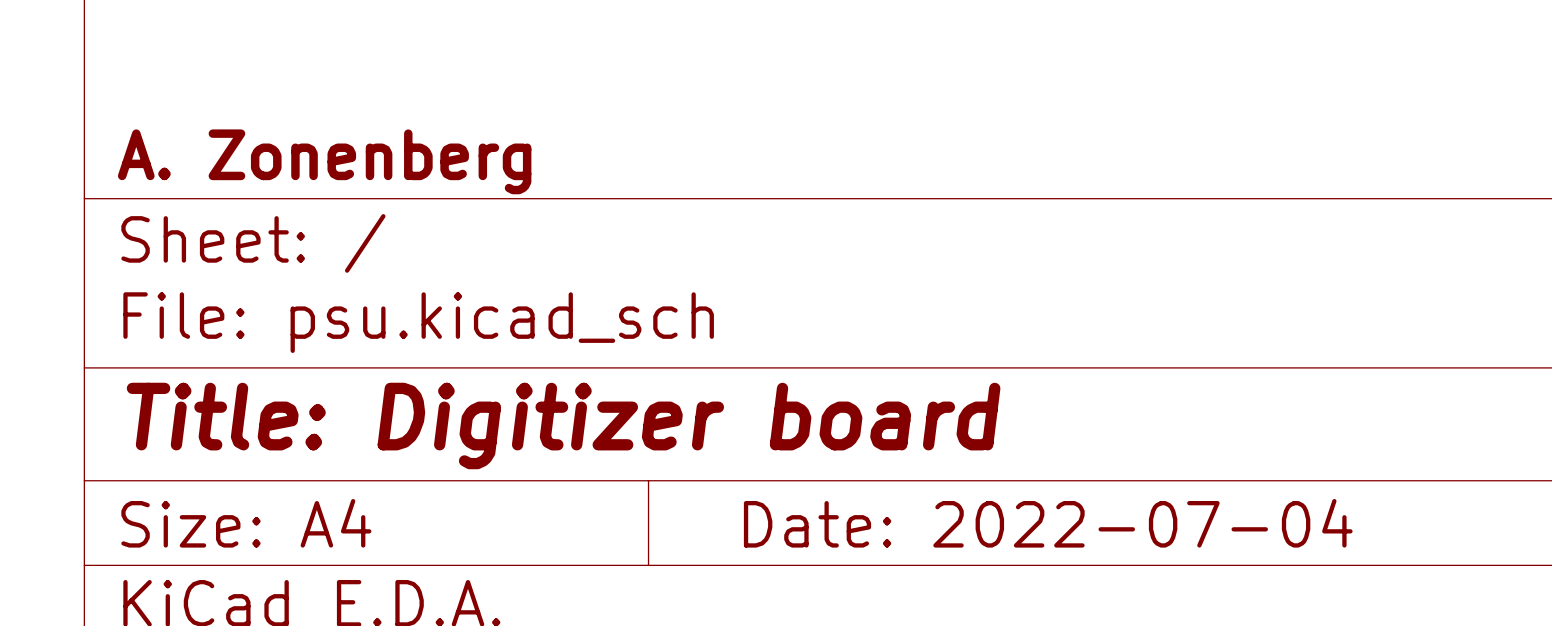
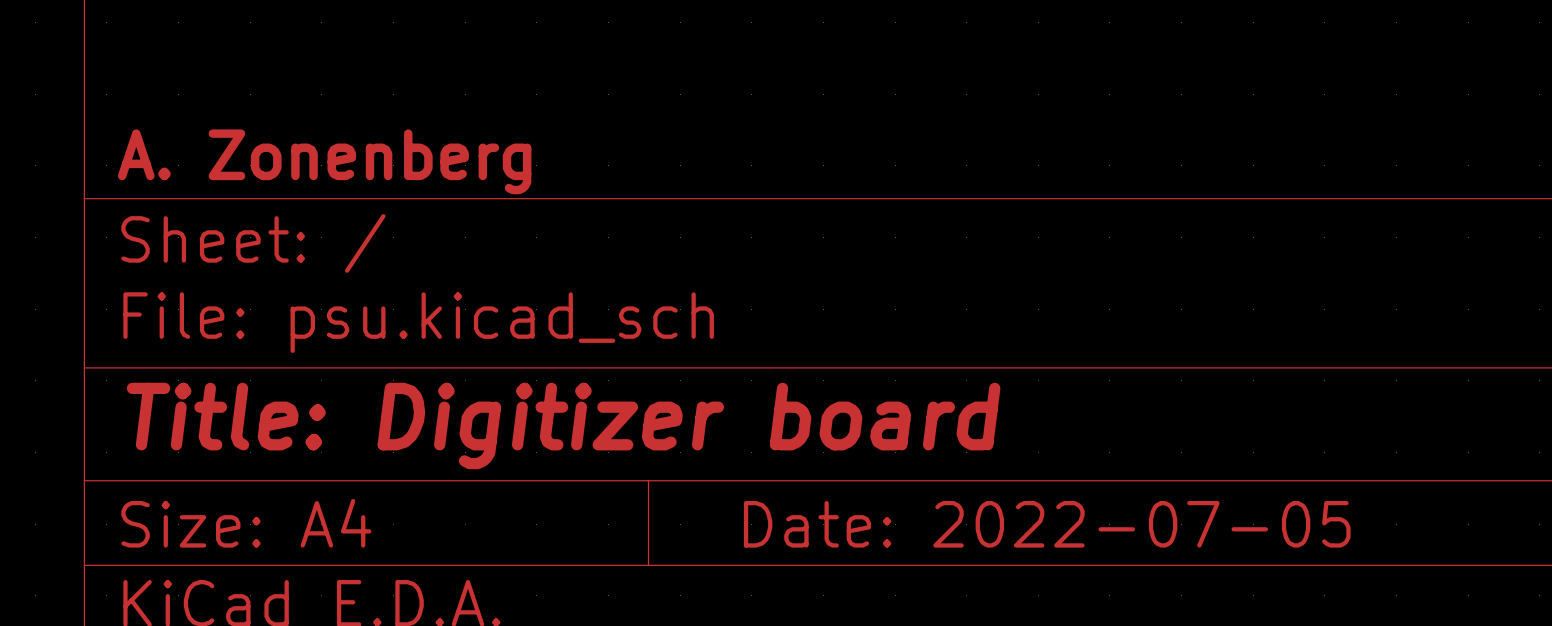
title block: Date: 2022-07-04 (1048, 523) -> Date: 2022-07-05 (1047, 524)

